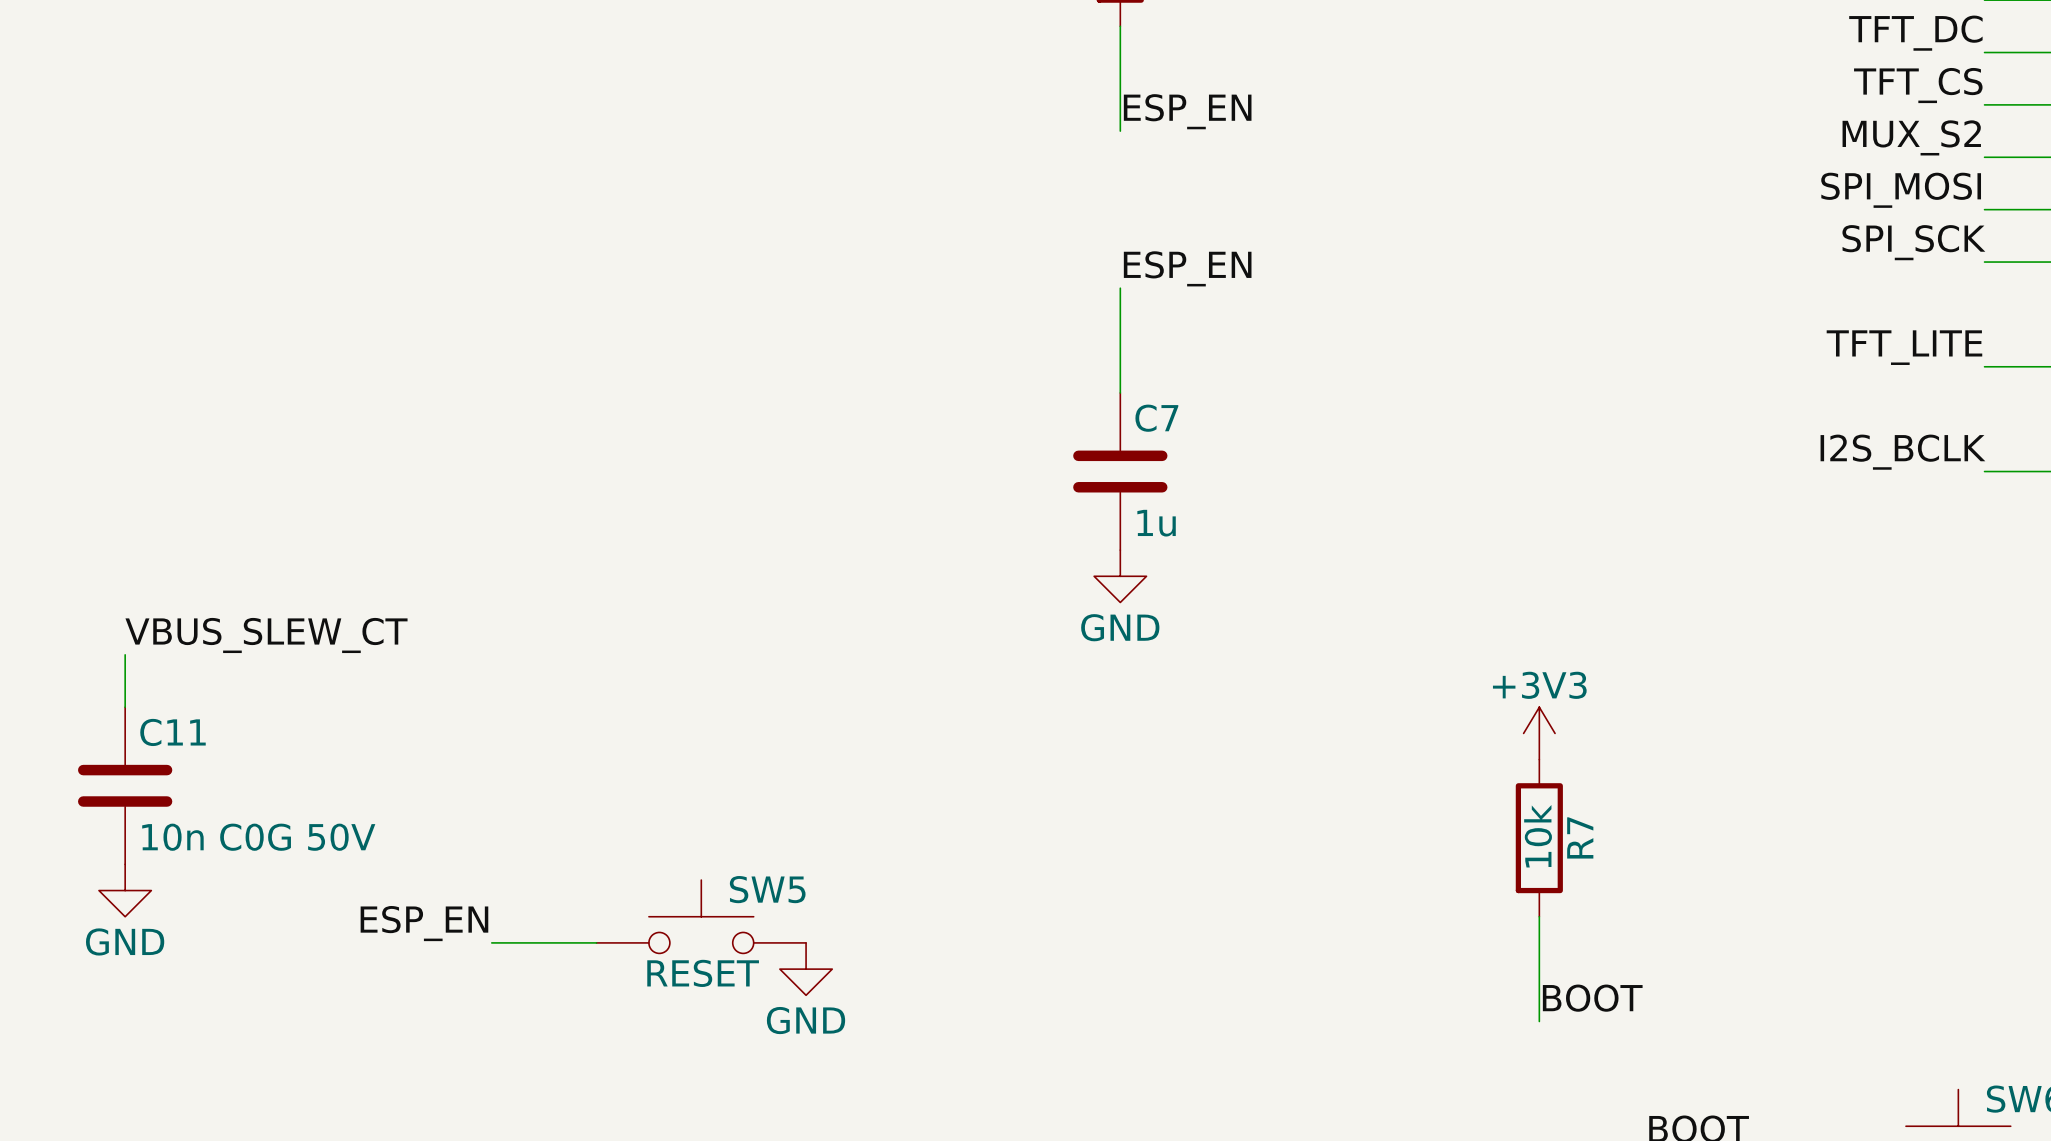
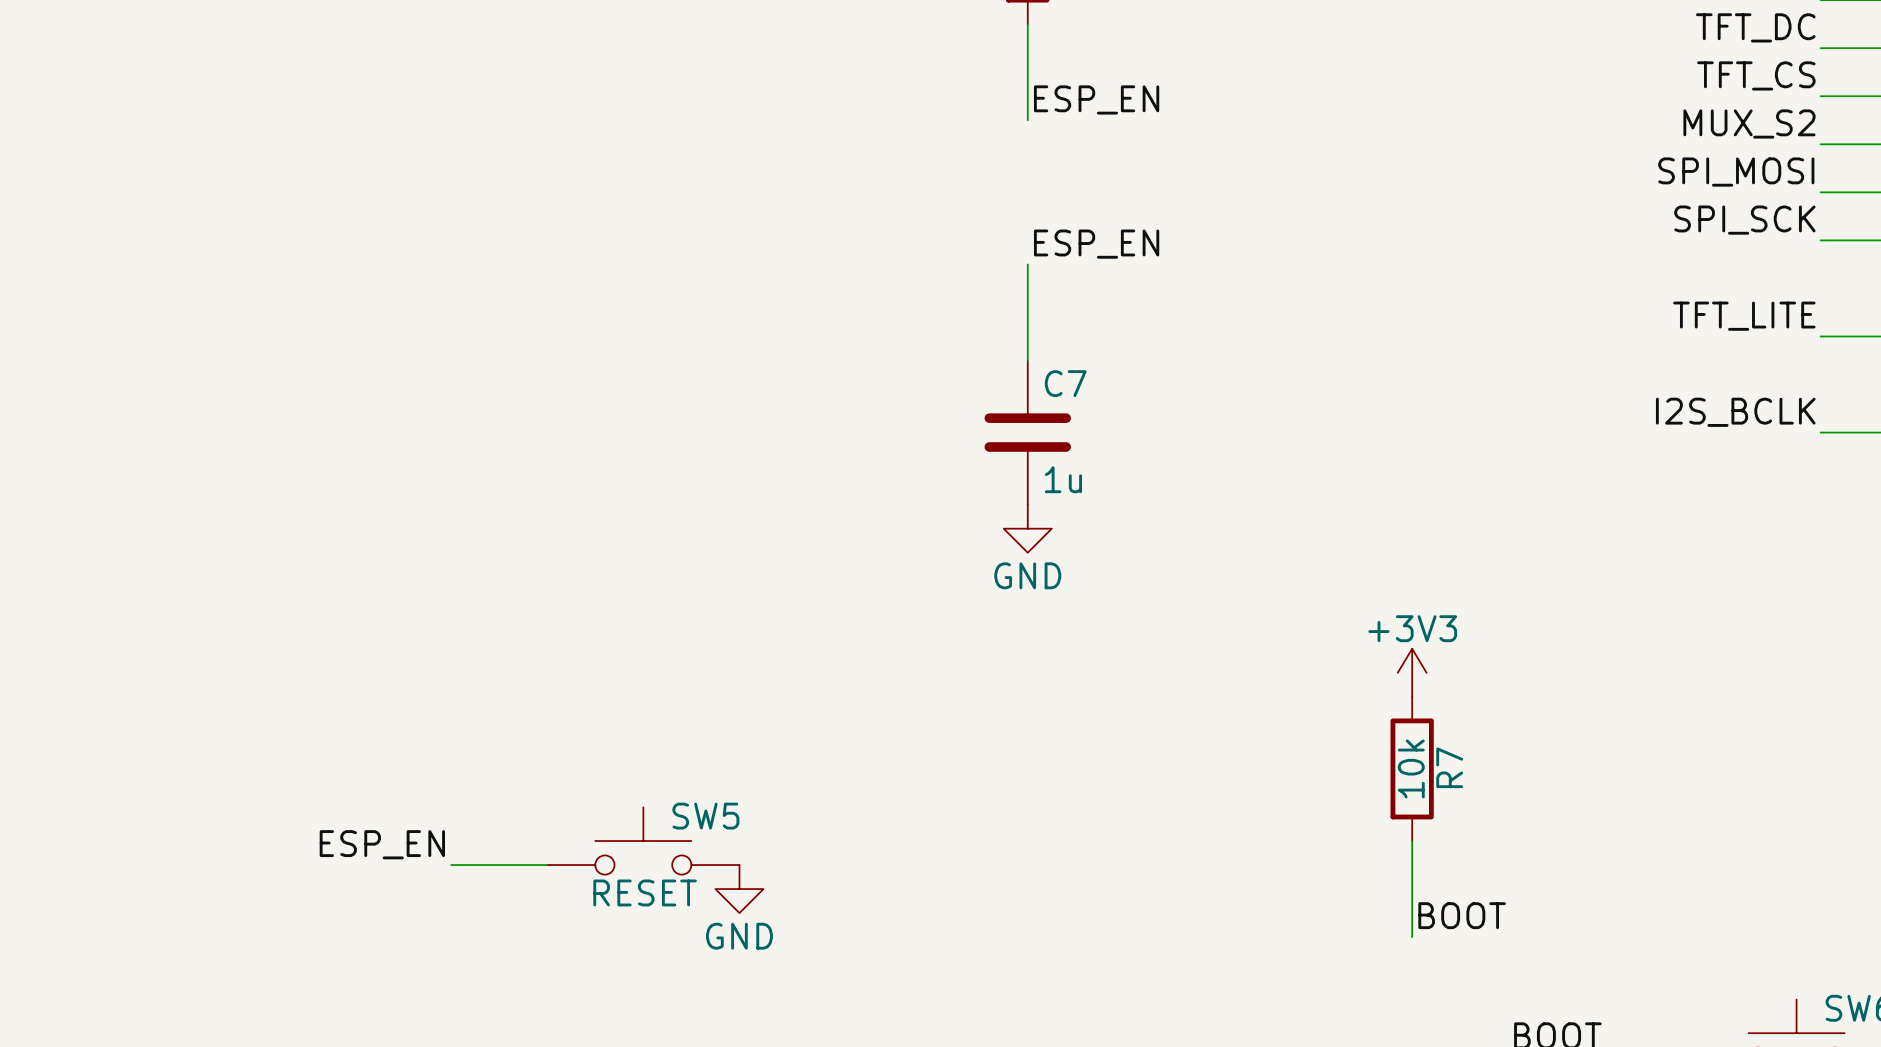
label: VBUS_SLEW_CT (266, 635) -> none
wire: (125, 654) (125, 707) -> none
C11: 10n C0G 50V (125, 785) -> none
power symbol: GND (125, 890) -> none

